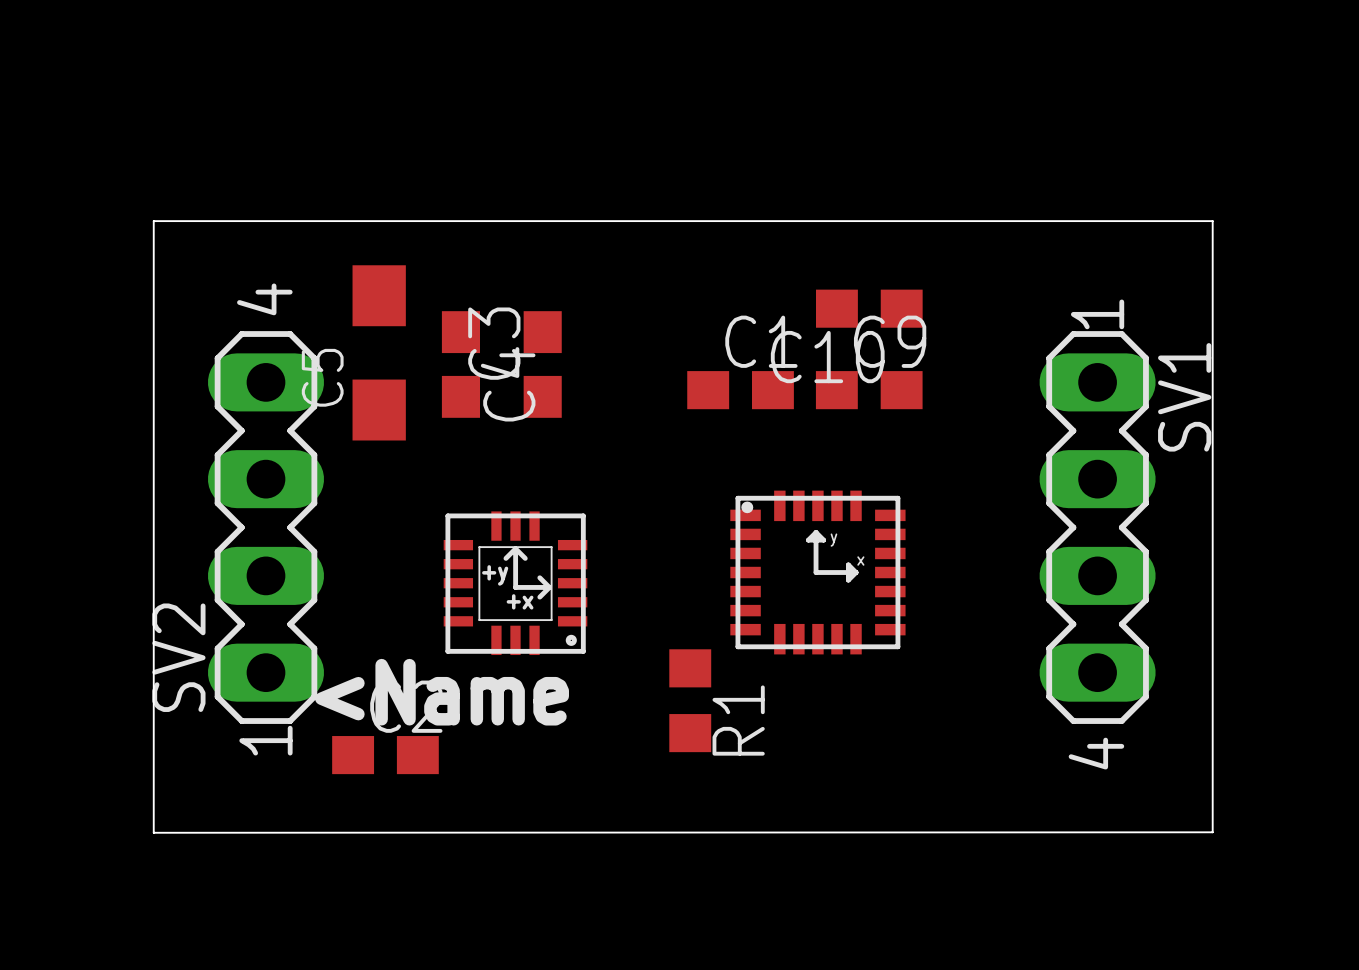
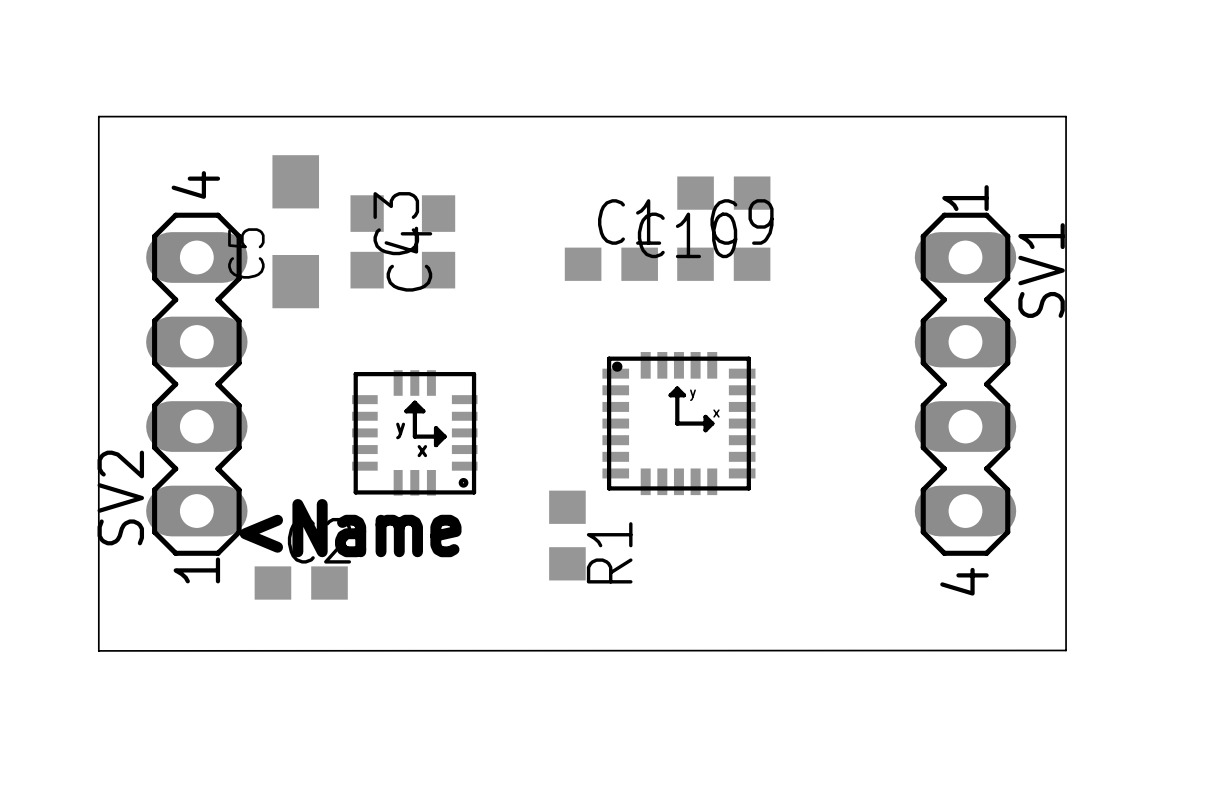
board edge: (1212, 221) (1212, 832) -> (1023, 116) (1066, 116) (1066, 650) (1023, 650)
part footprint: [443, 511, 588, 656] -> [352, 370, 478, 496]
SV1 position: (1097, 527) -> (965, 384)

